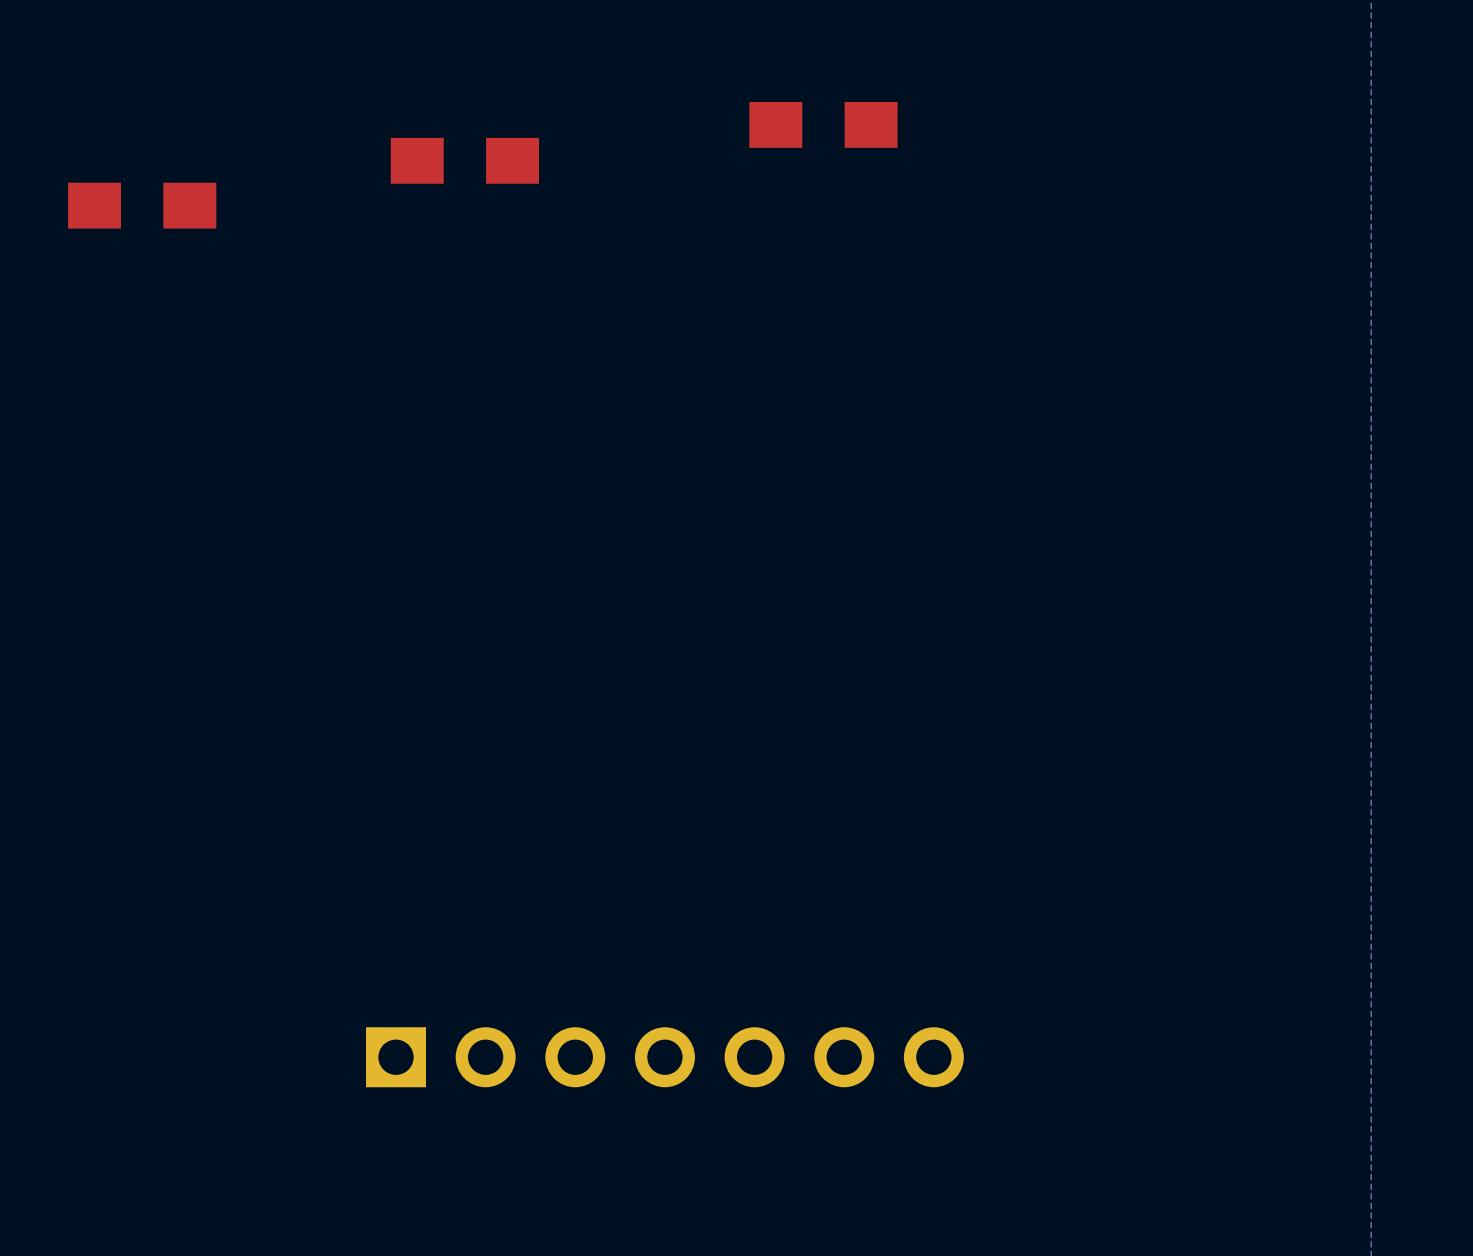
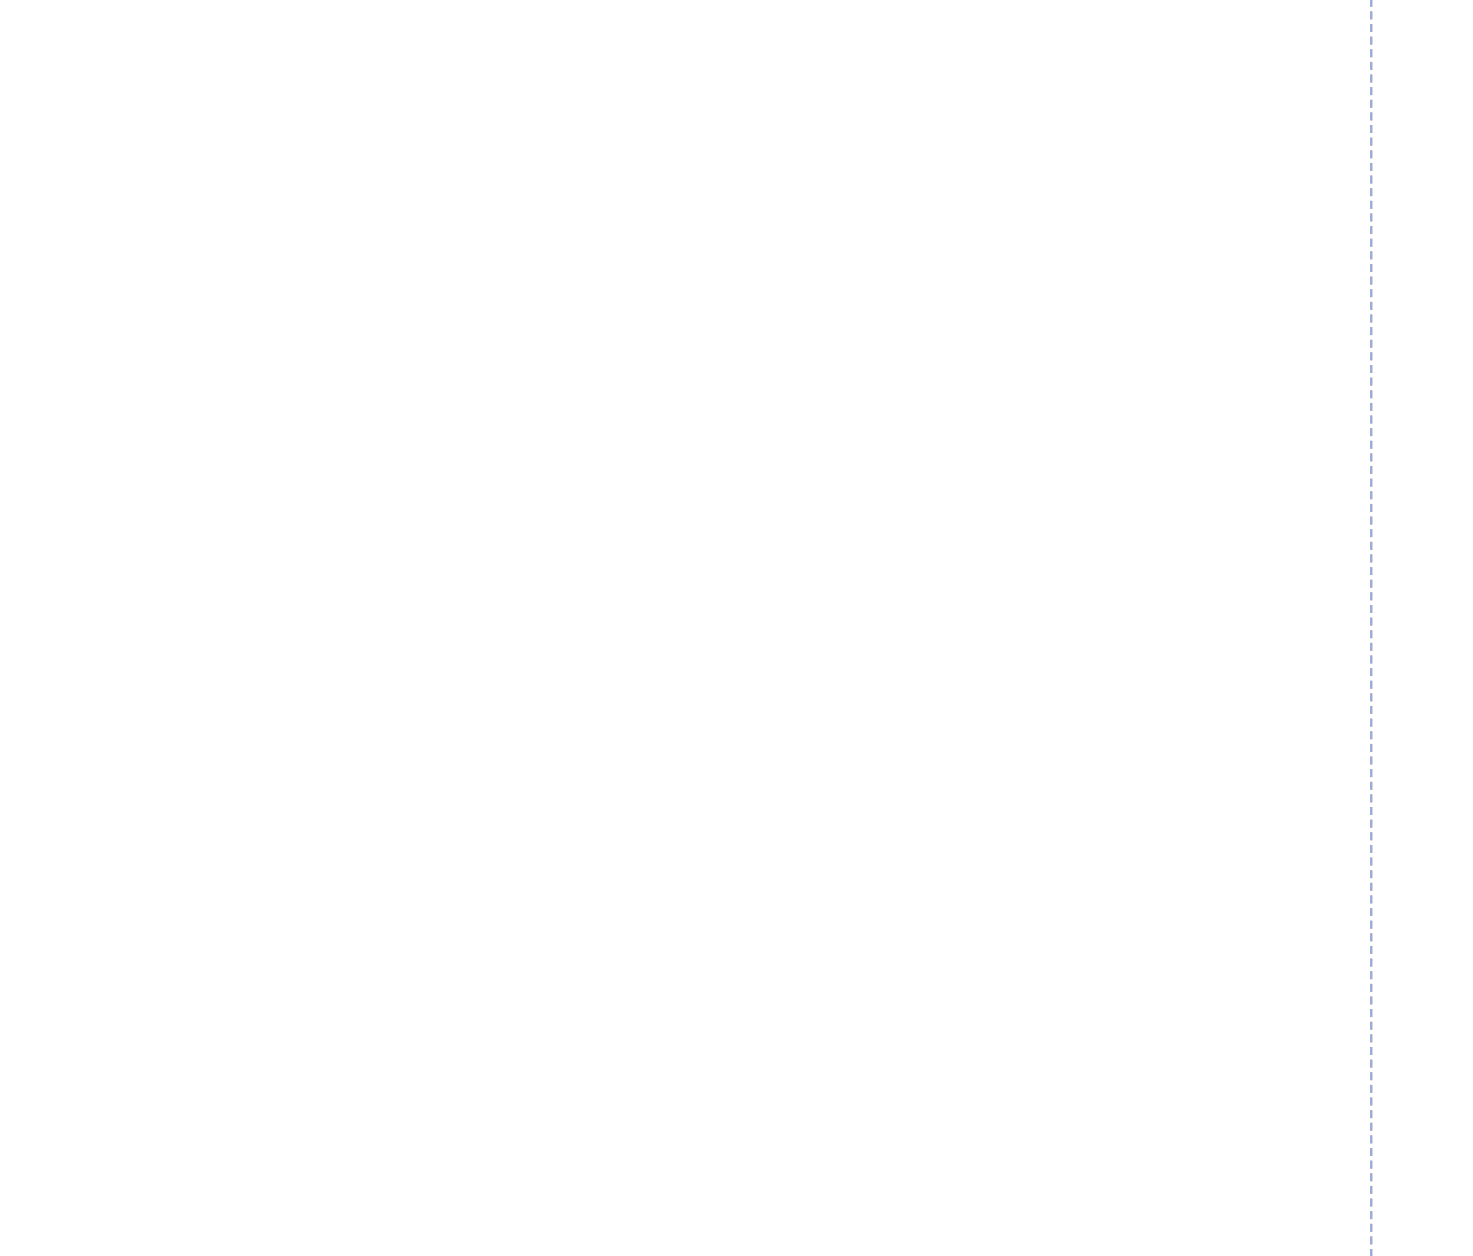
part: (823, 124) -> none
part: (464, 160) -> none
part: (142, 205) -> none
part: (664, 1057) -> none

